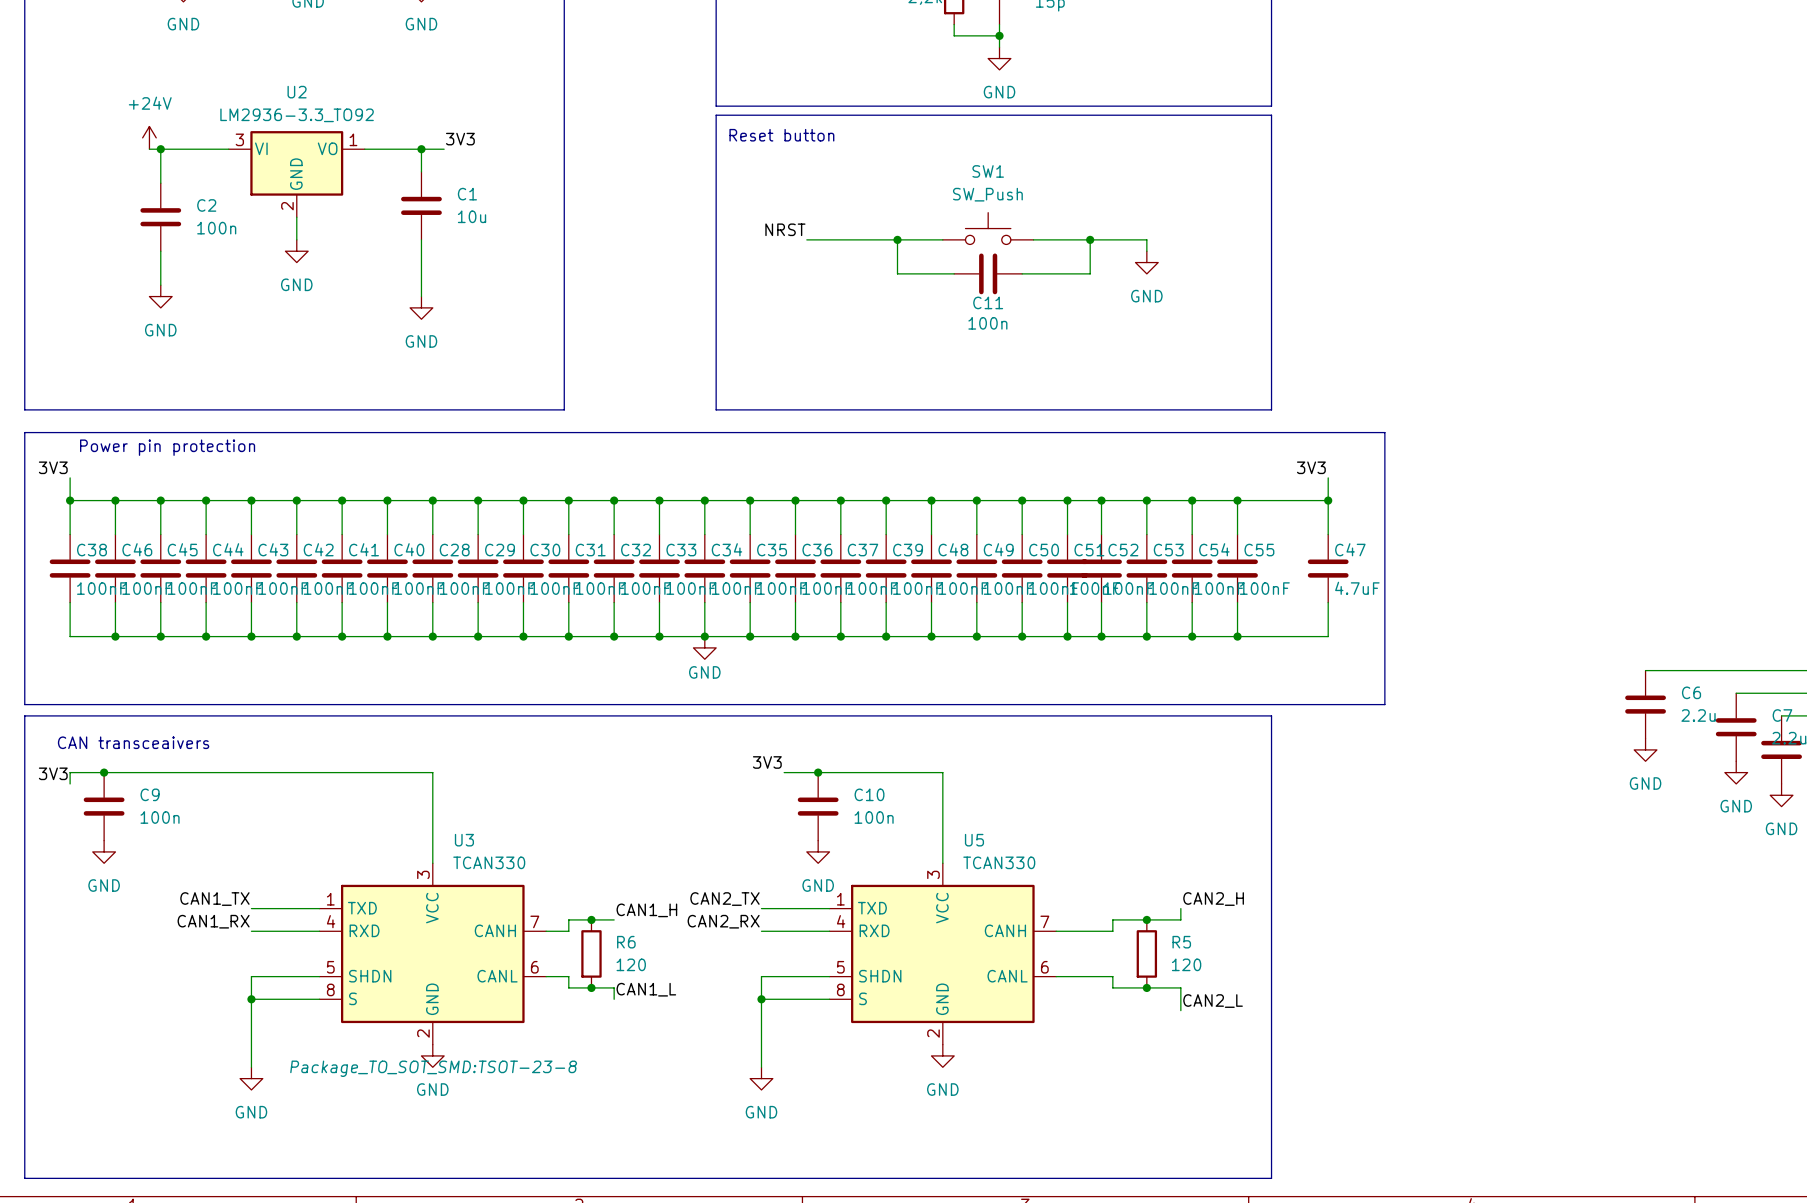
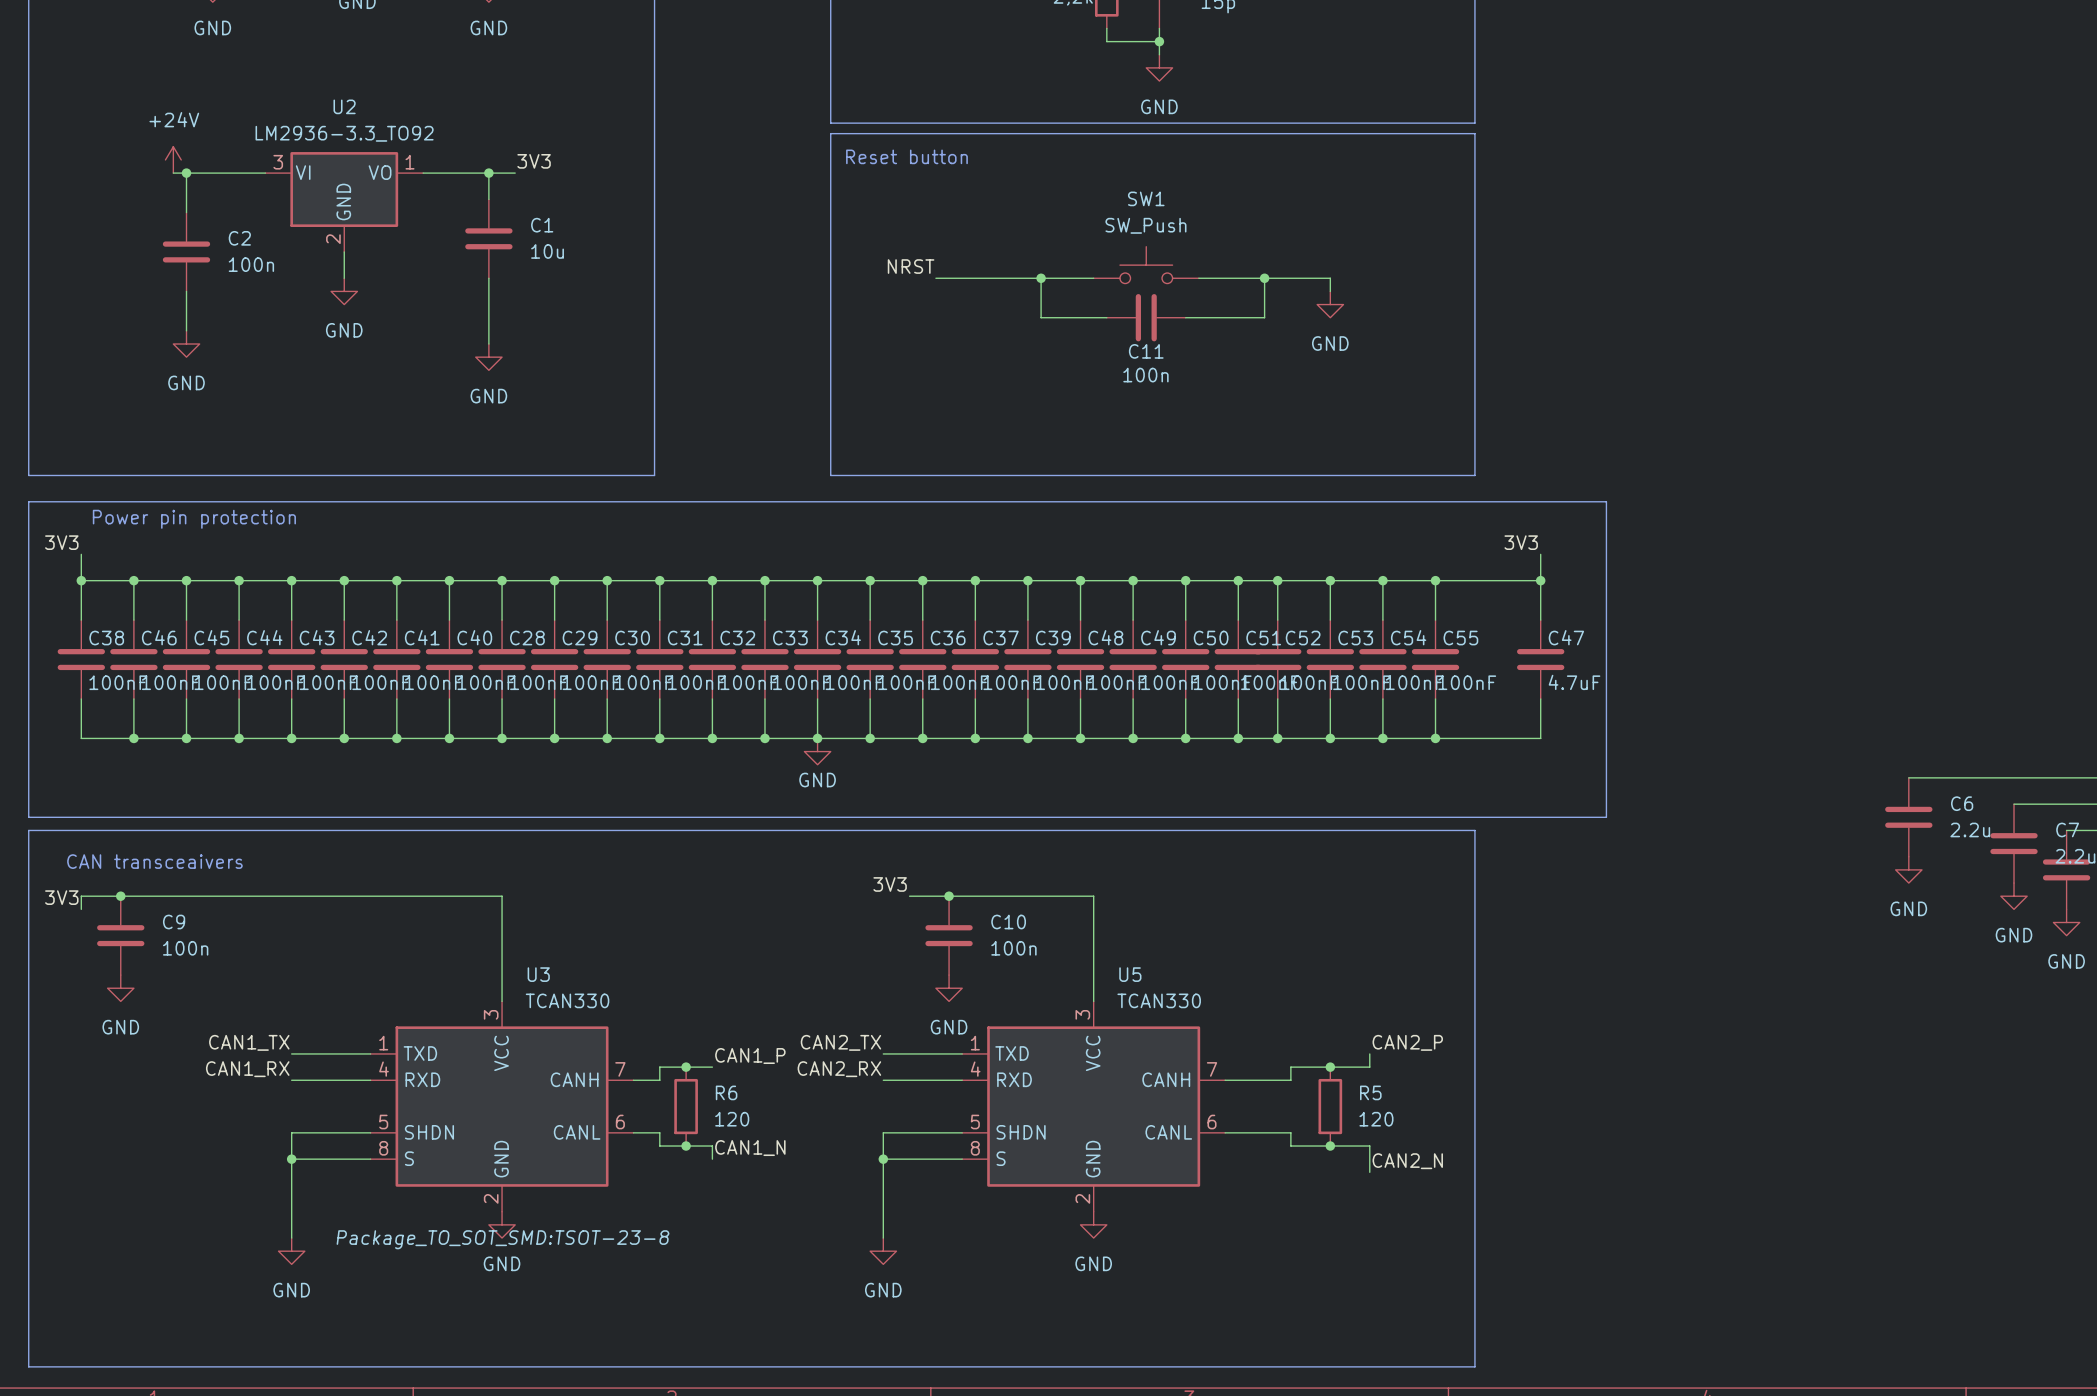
label: CAN2_H (1213, 899) -> CAN2_P (1407, 1042)
label: CAN1_H (646, 910) -> CAN1_P (750, 1056)
label: CAN1_L (646, 989) -> CAN1_N (750, 1148)
label: CAN2_L (1213, 1001) -> CAN2_N (1407, 1161)

